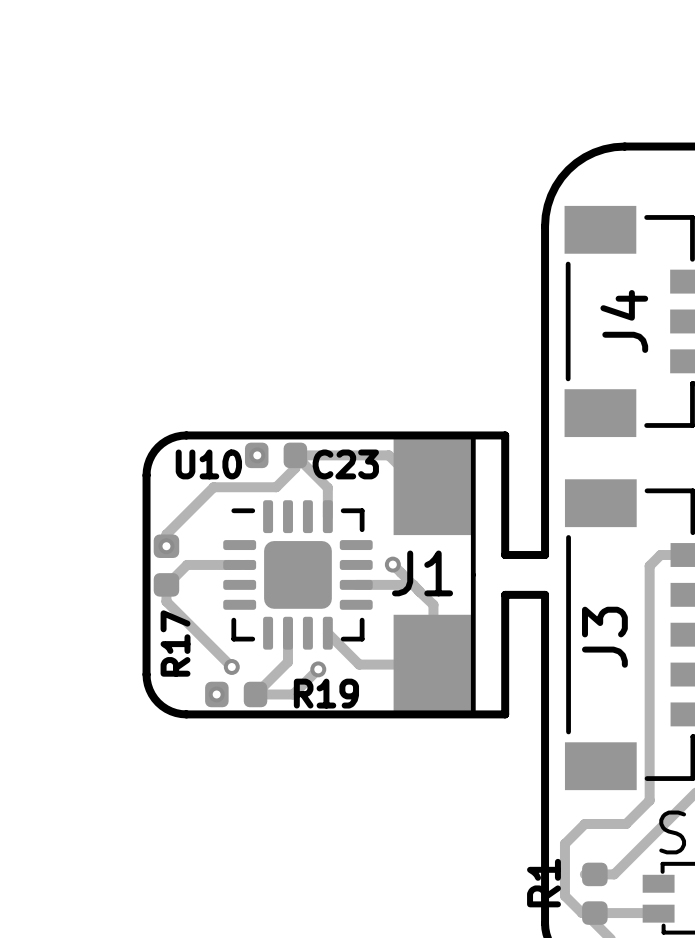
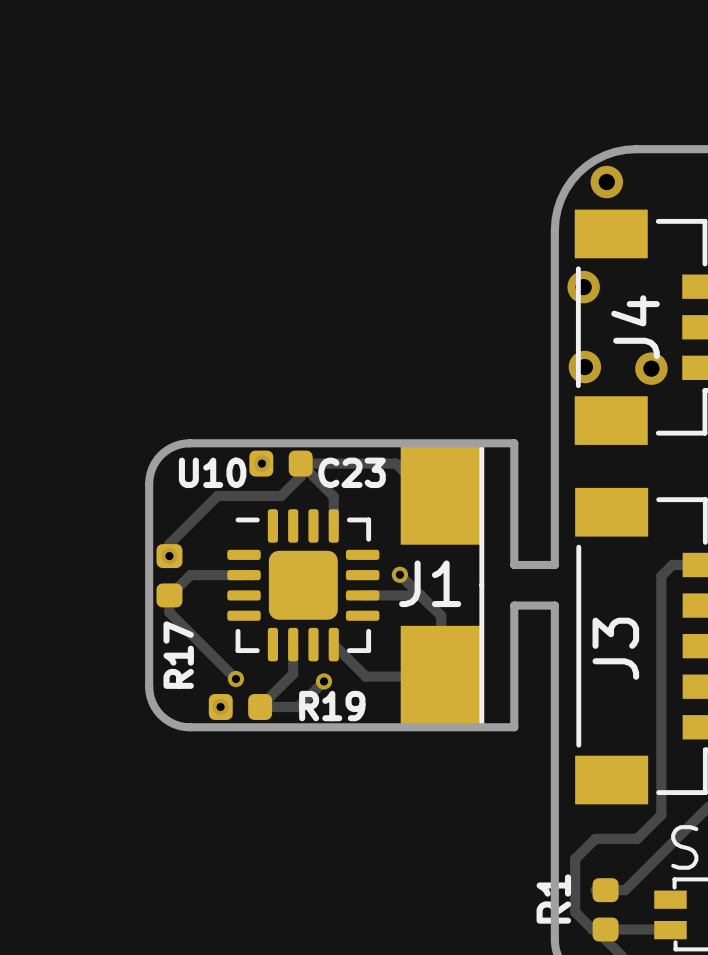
via: none -> (606, 182)
via: none -> (583, 287)
via: none -> (584, 367)
via: none -> (651, 368)

